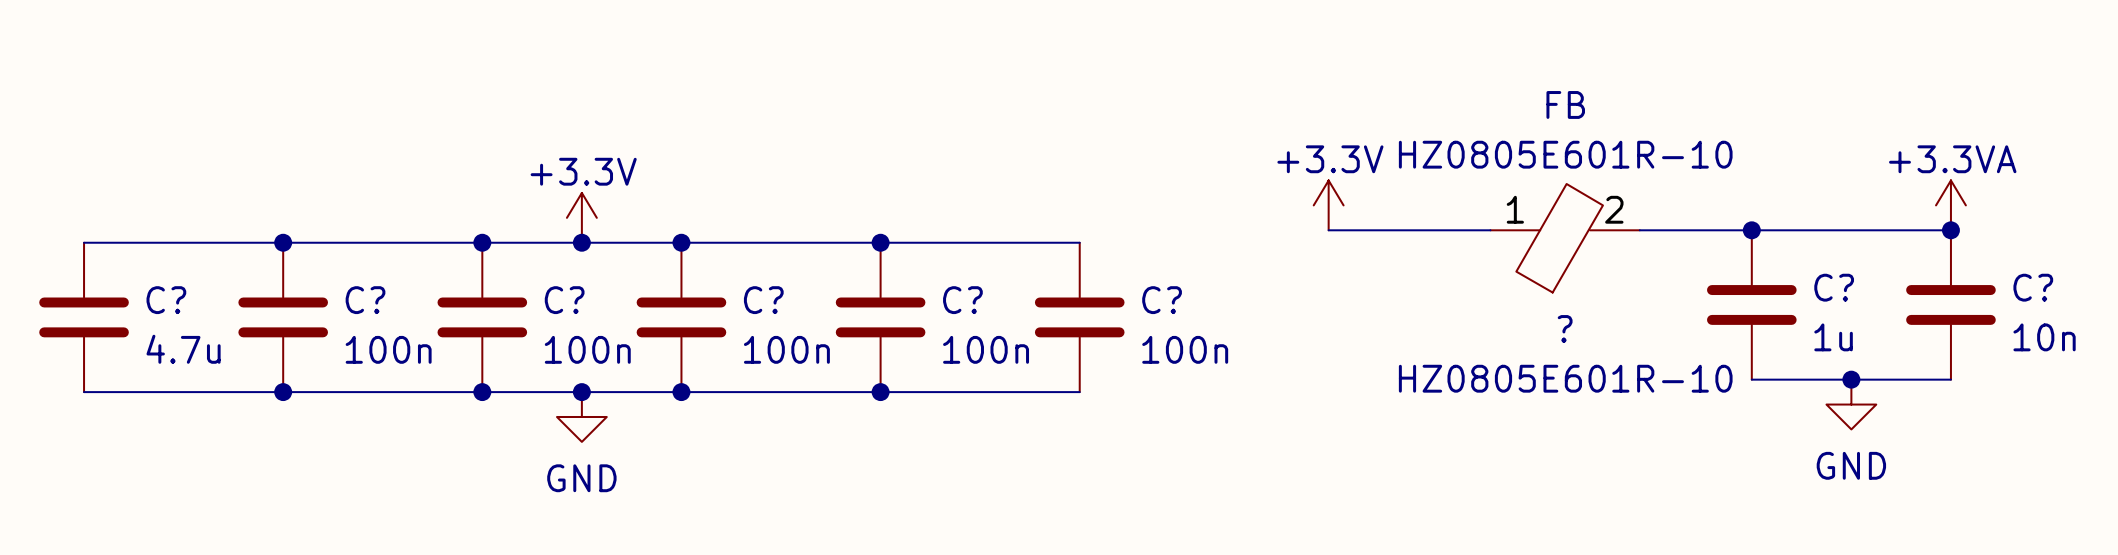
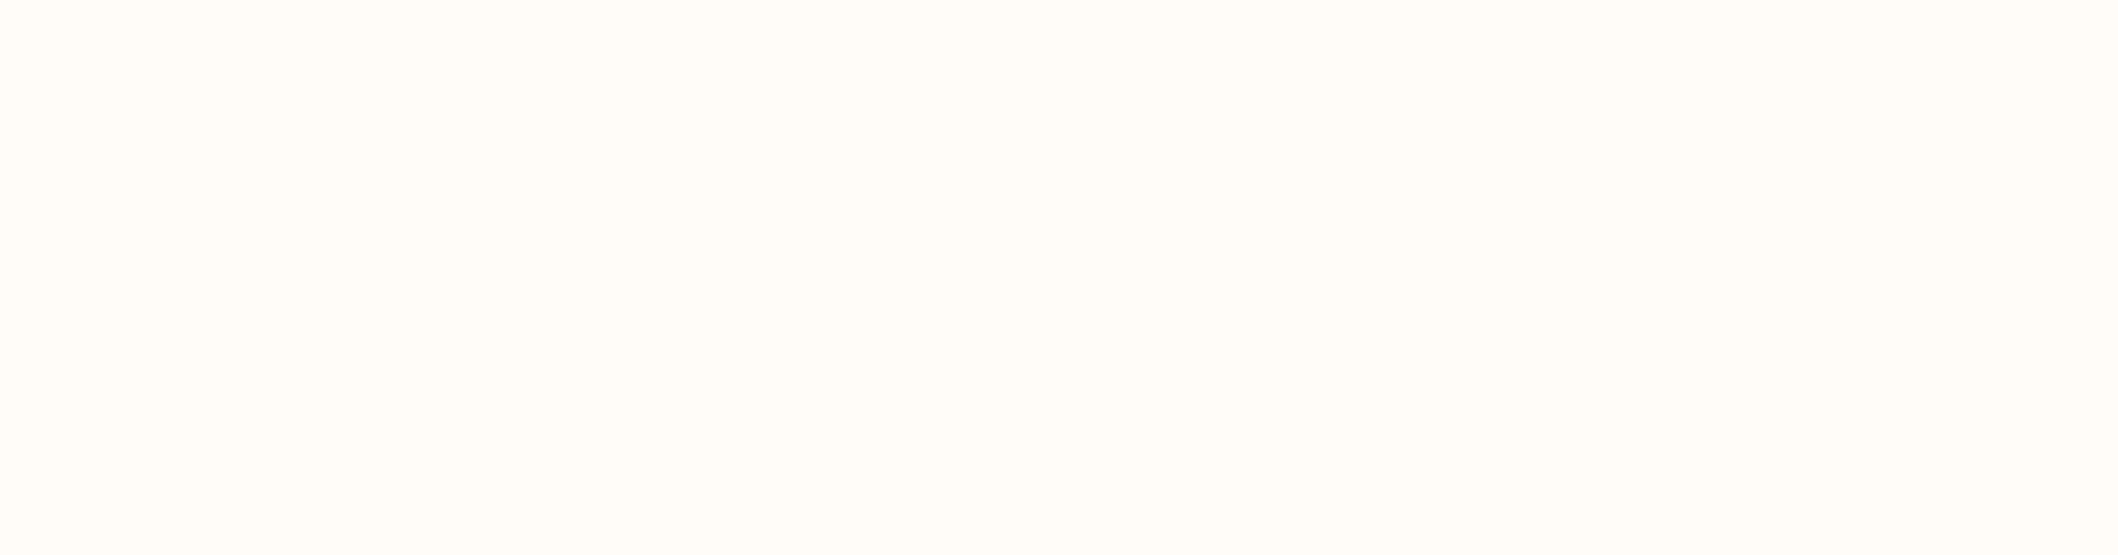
power symbol: +3.3V (1328, 205) -> none
power symbol: +3.3VA (1950, 205) -> none
power symbol: +3.3V (581, 217) -> none
wire: (1328, 230) (1490, 230) -> none
wire: (1639, 230) (1950, 230) -> none
junction: (1751, 230) -> none
junction: (1950, 230) -> none
part: HZ0805E601R-10 (1565, 238) -> none
wire: (84, 242) (1079, 242) -> none
junction: (283, 242) -> none
junction: (482, 242) -> none
junction: (581, 242) -> none
junction: (681, 242) -> none
junction: (880, 242) -> none
C?: 1u (1751, 304) -> none
C?: 10n (1950, 304) -> none
C?: 4.7u (84, 317) -> none
C?: 100n (283, 317) -> none
C?: 100n (482, 317) -> none
C?: 100n (681, 317) -> none
C?: 100n (880, 317) -> none
C?: 100n (1079, 317) -> none
wire: (1751, 379) (1950, 379) -> none
junction: (1851, 379) -> none
wire: (84, 392) (1079, 392) -> none
junction: (283, 392) -> none
junction: (482, 392) -> none
junction: (581, 392) -> none
junction: (681, 392) -> none
junction: (880, 392) -> none
power symbol: GND (1851, 404) -> none
power symbol: GND (581, 416) -> none

